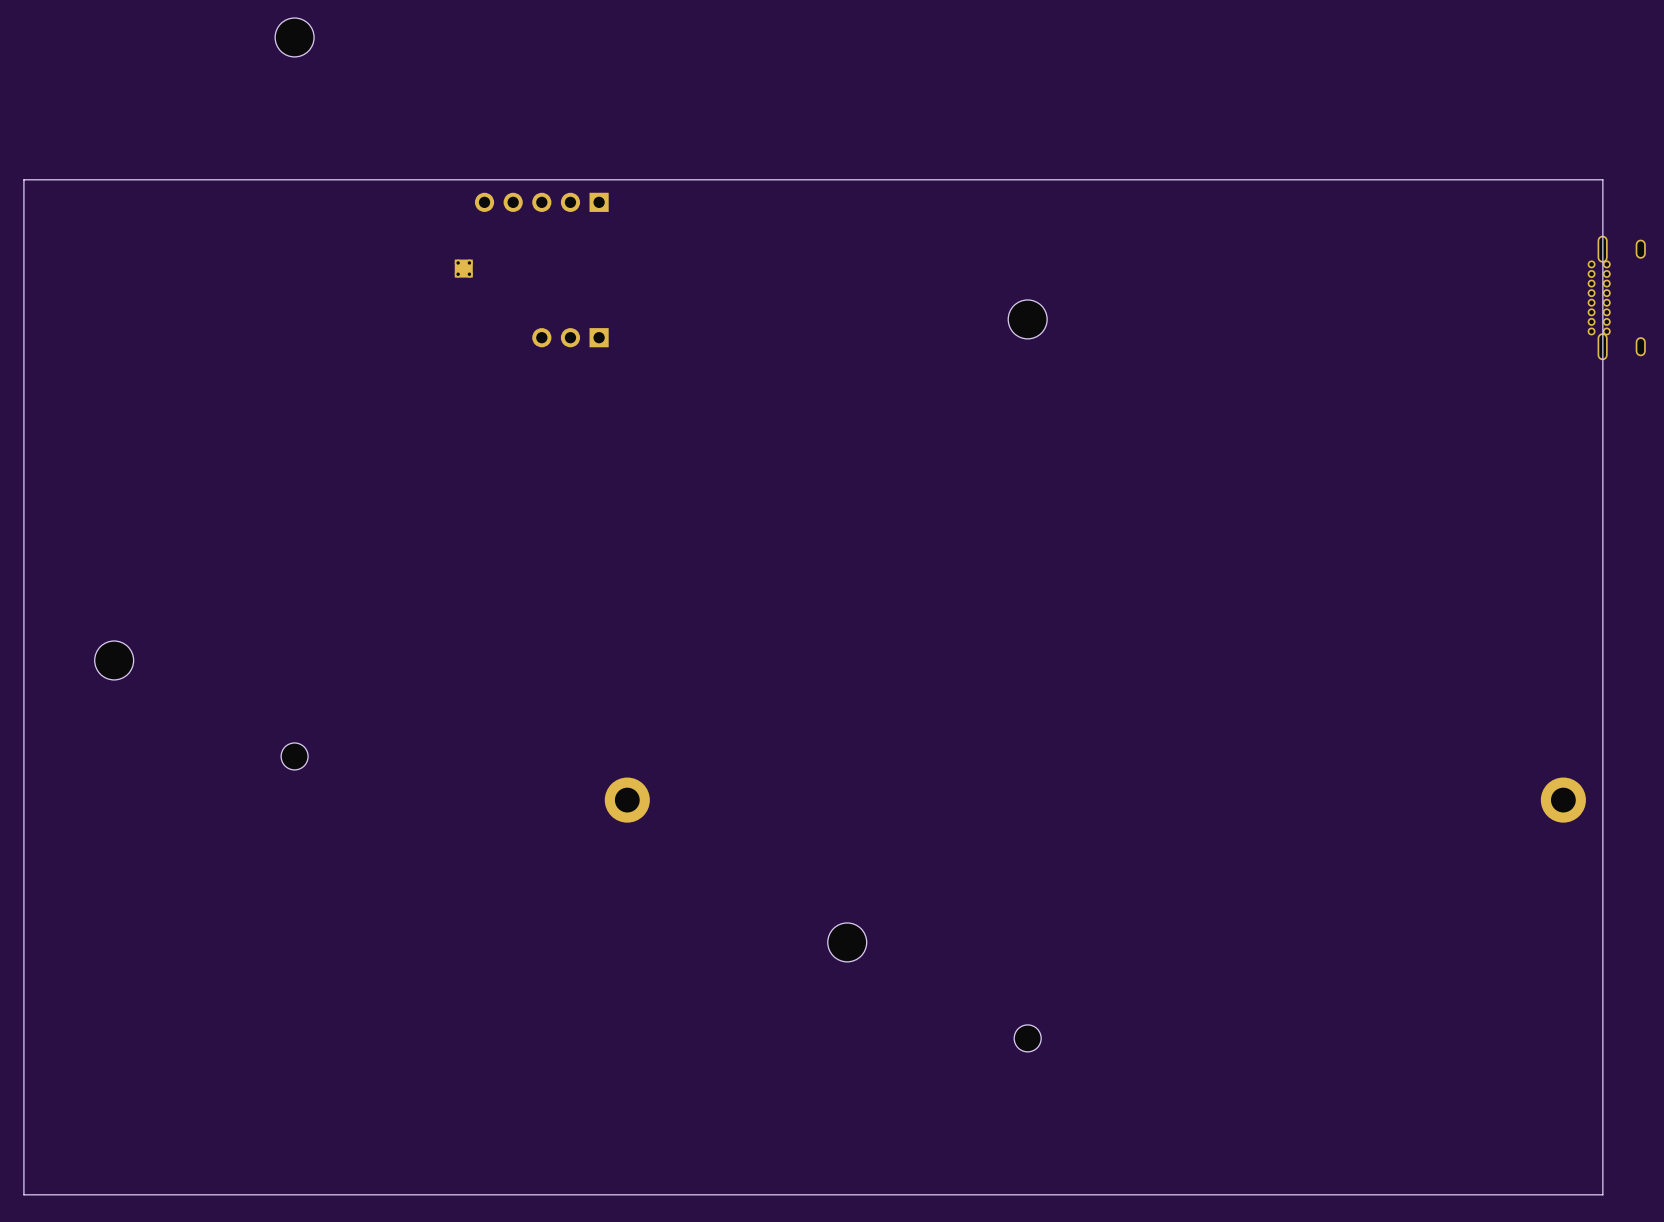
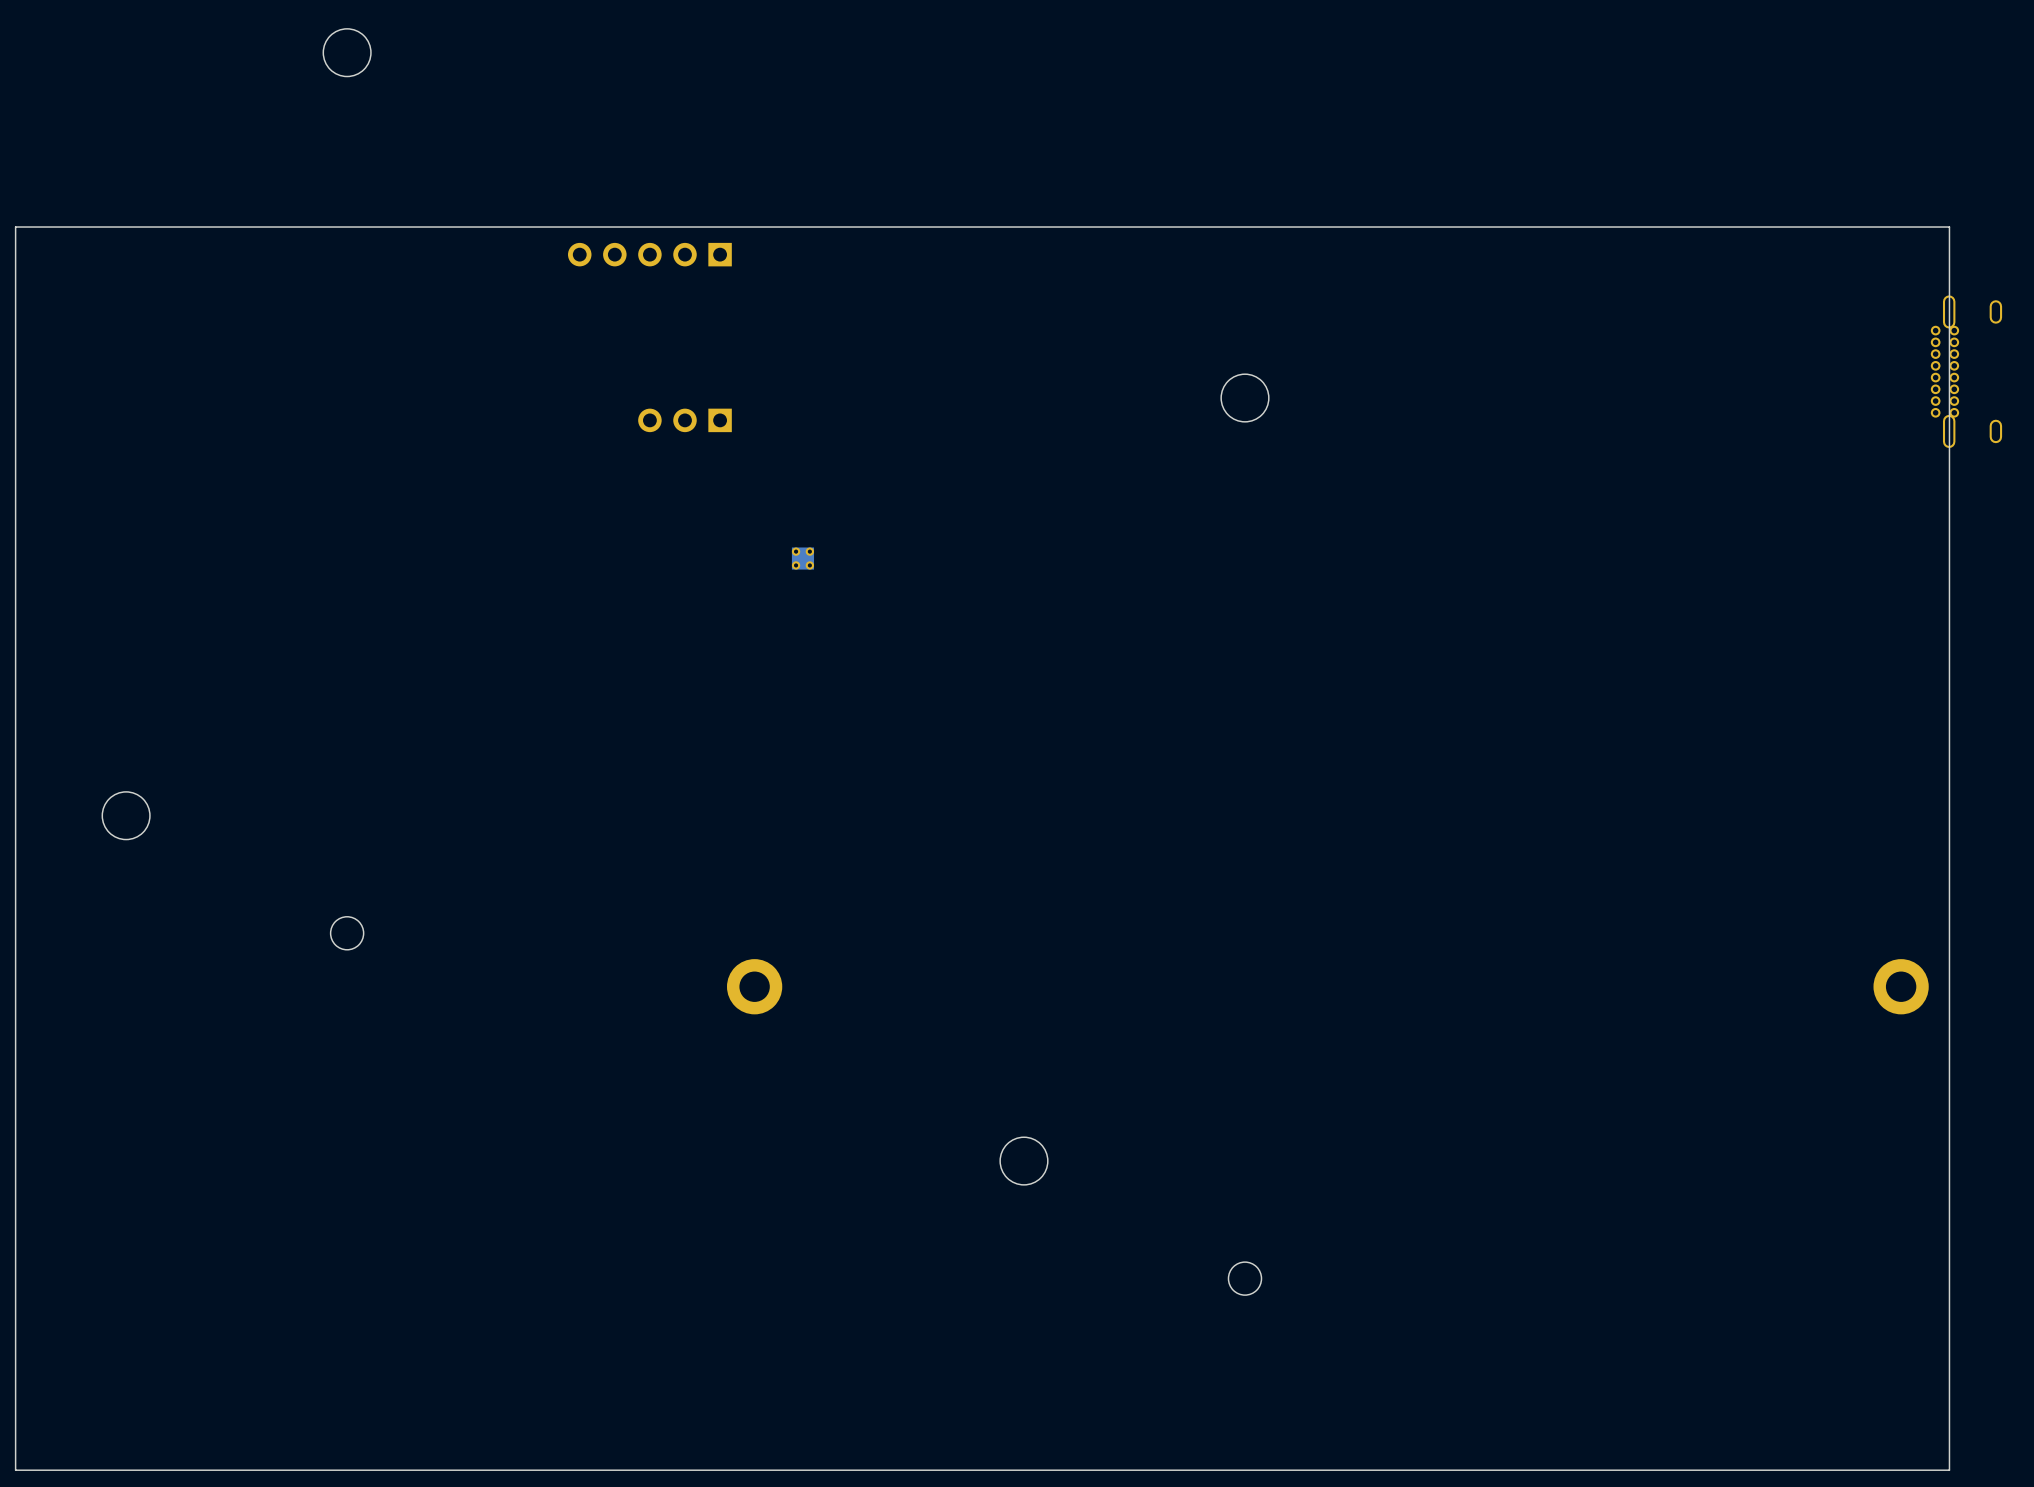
part position: (463, 268) -> (802, 558)

